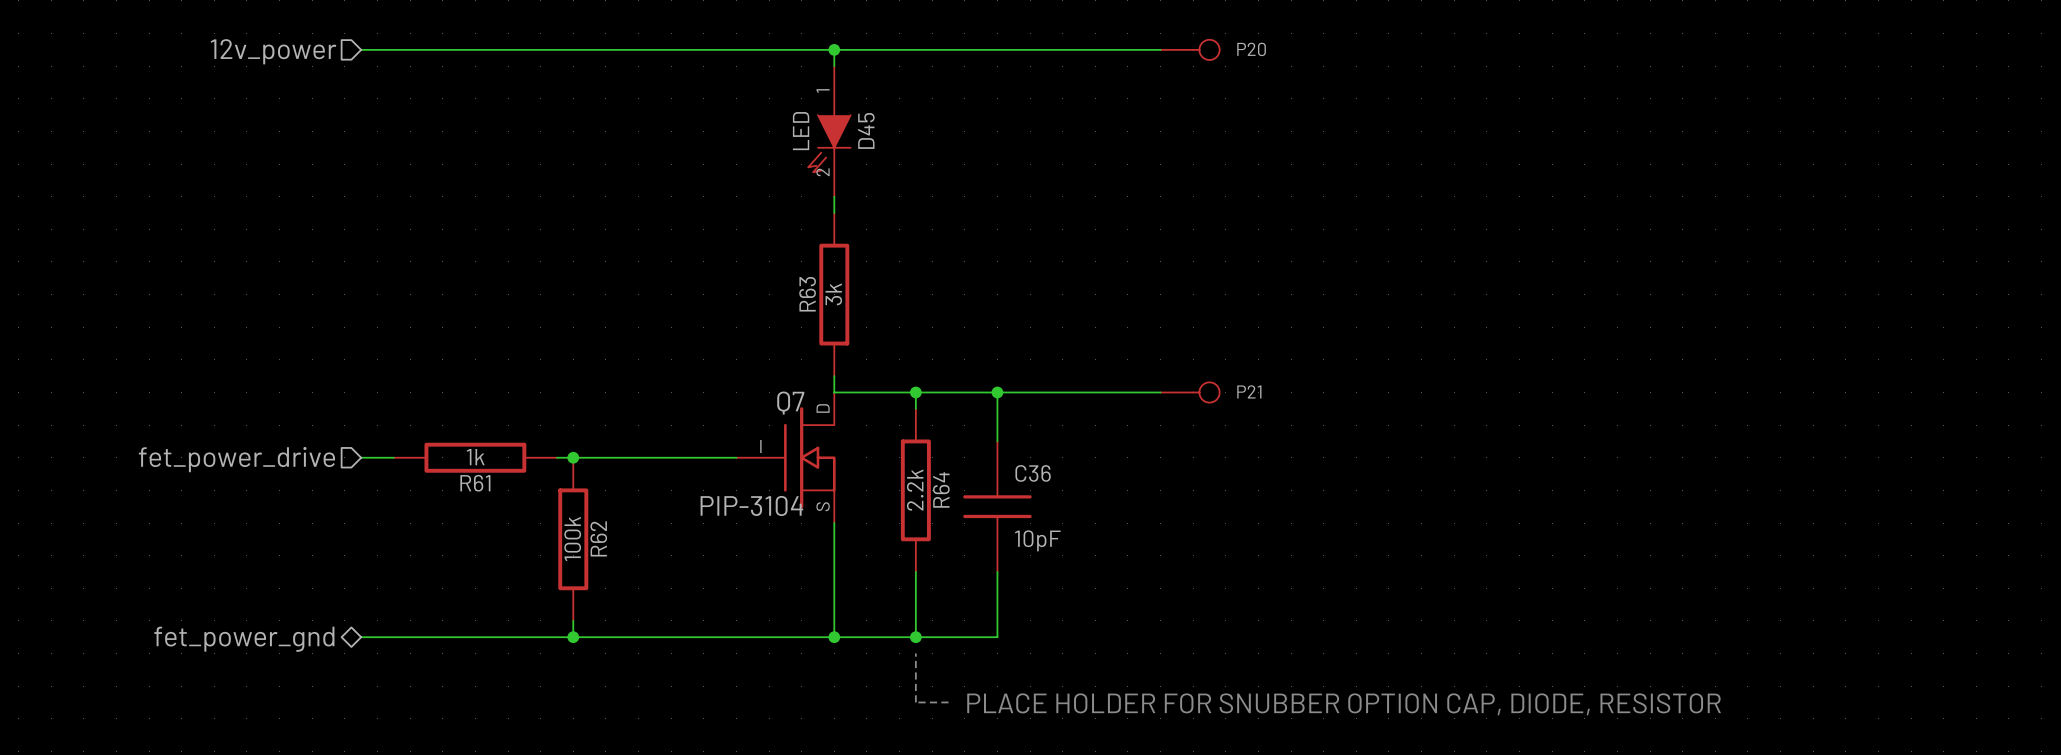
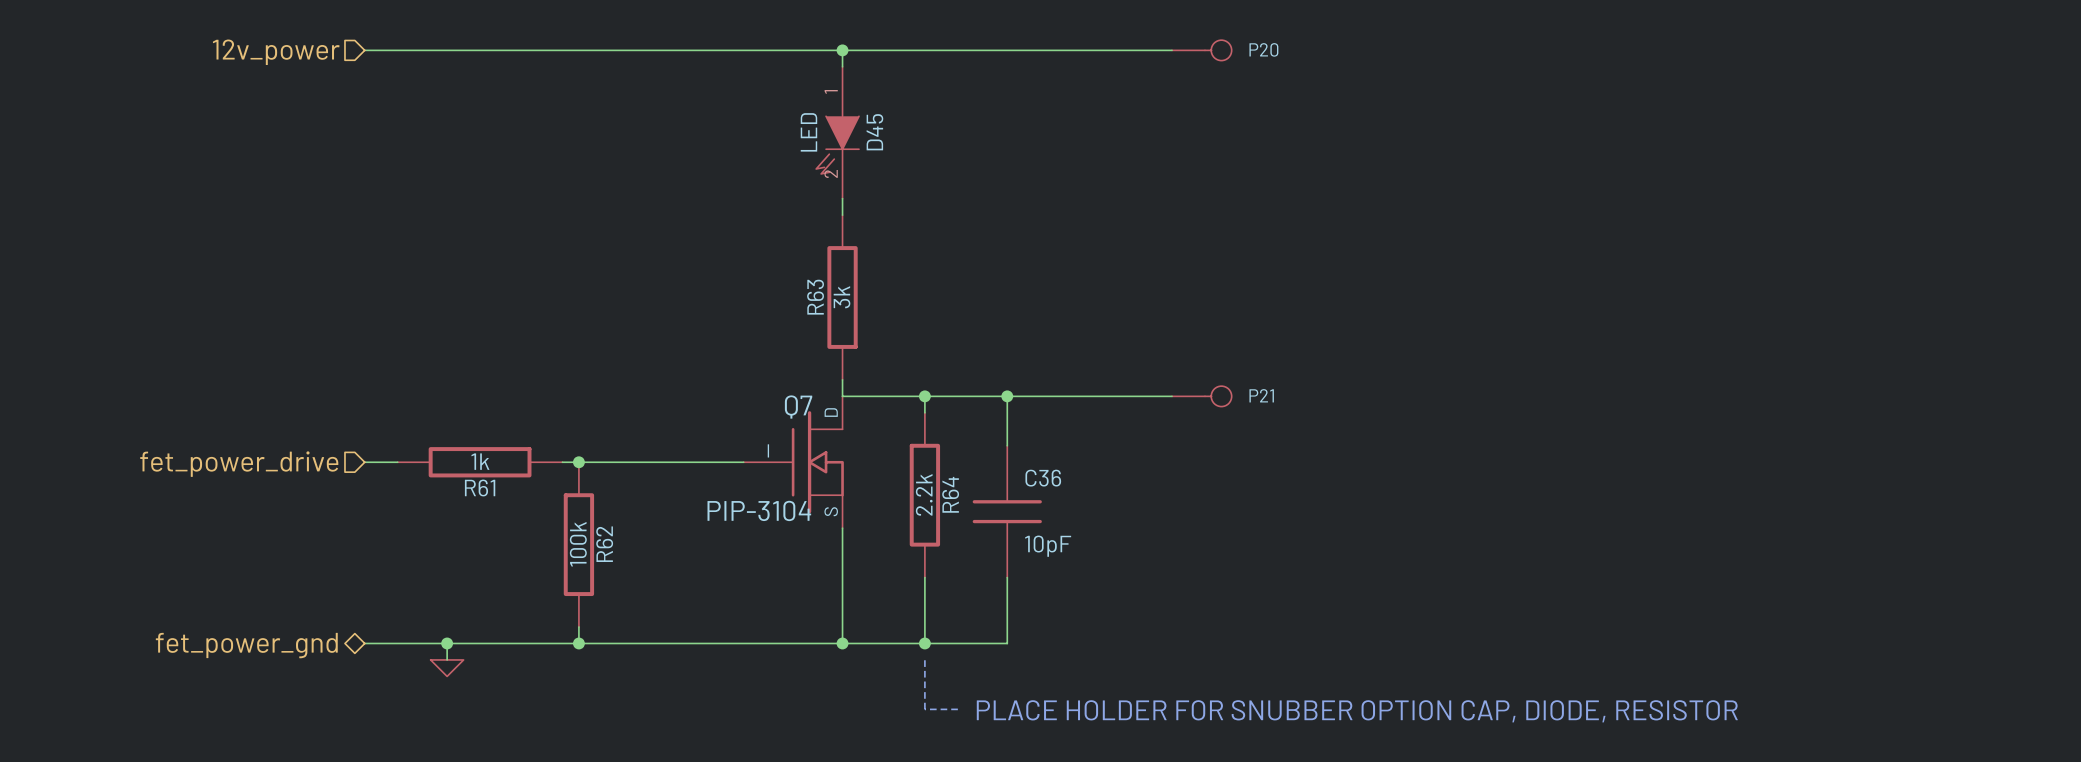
wire: none -> (447, 643) (447, 659)
junction: none -> (447, 643)
power symbol: none -> (447, 668)

